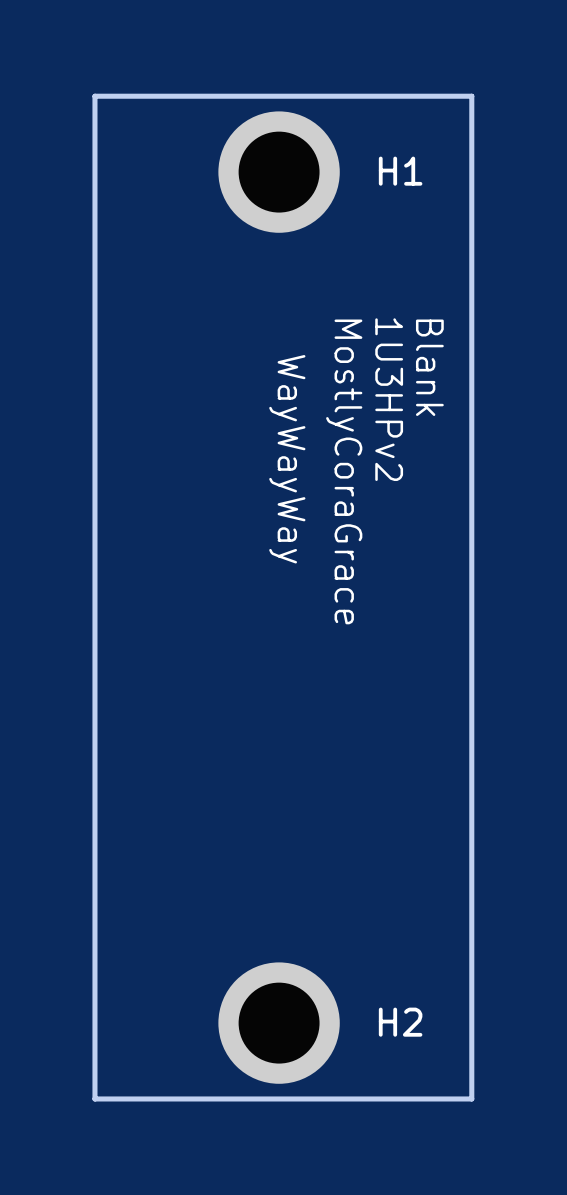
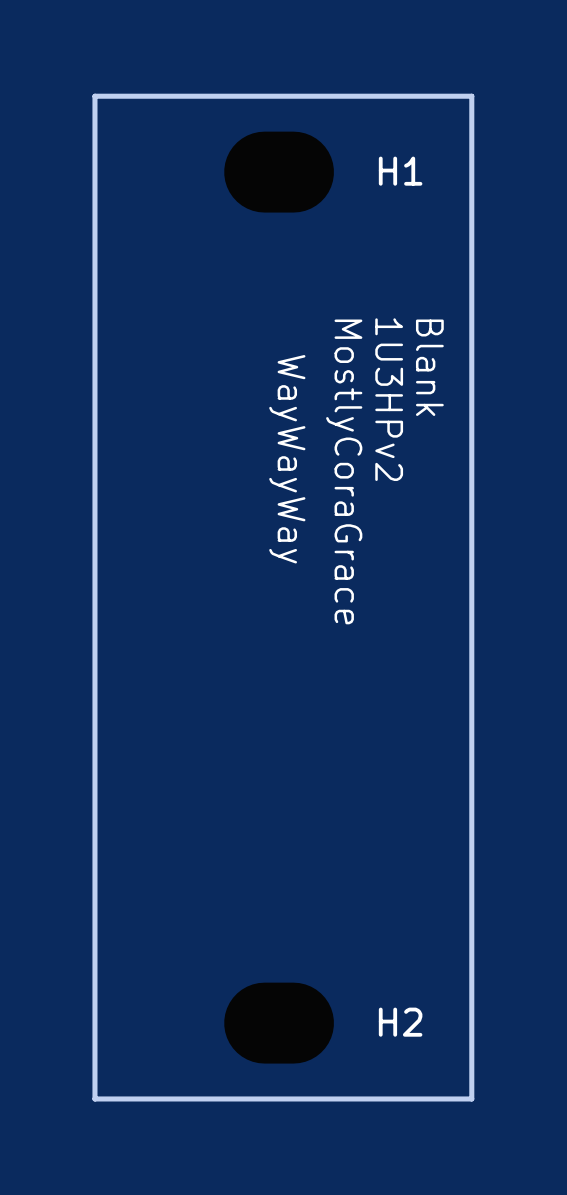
H1 footprint: [218, 111, 340, 233] -> [224, 131, 334, 213]
H2 footprint: [218, 962, 340, 1084] -> [224, 982, 334, 1064]

